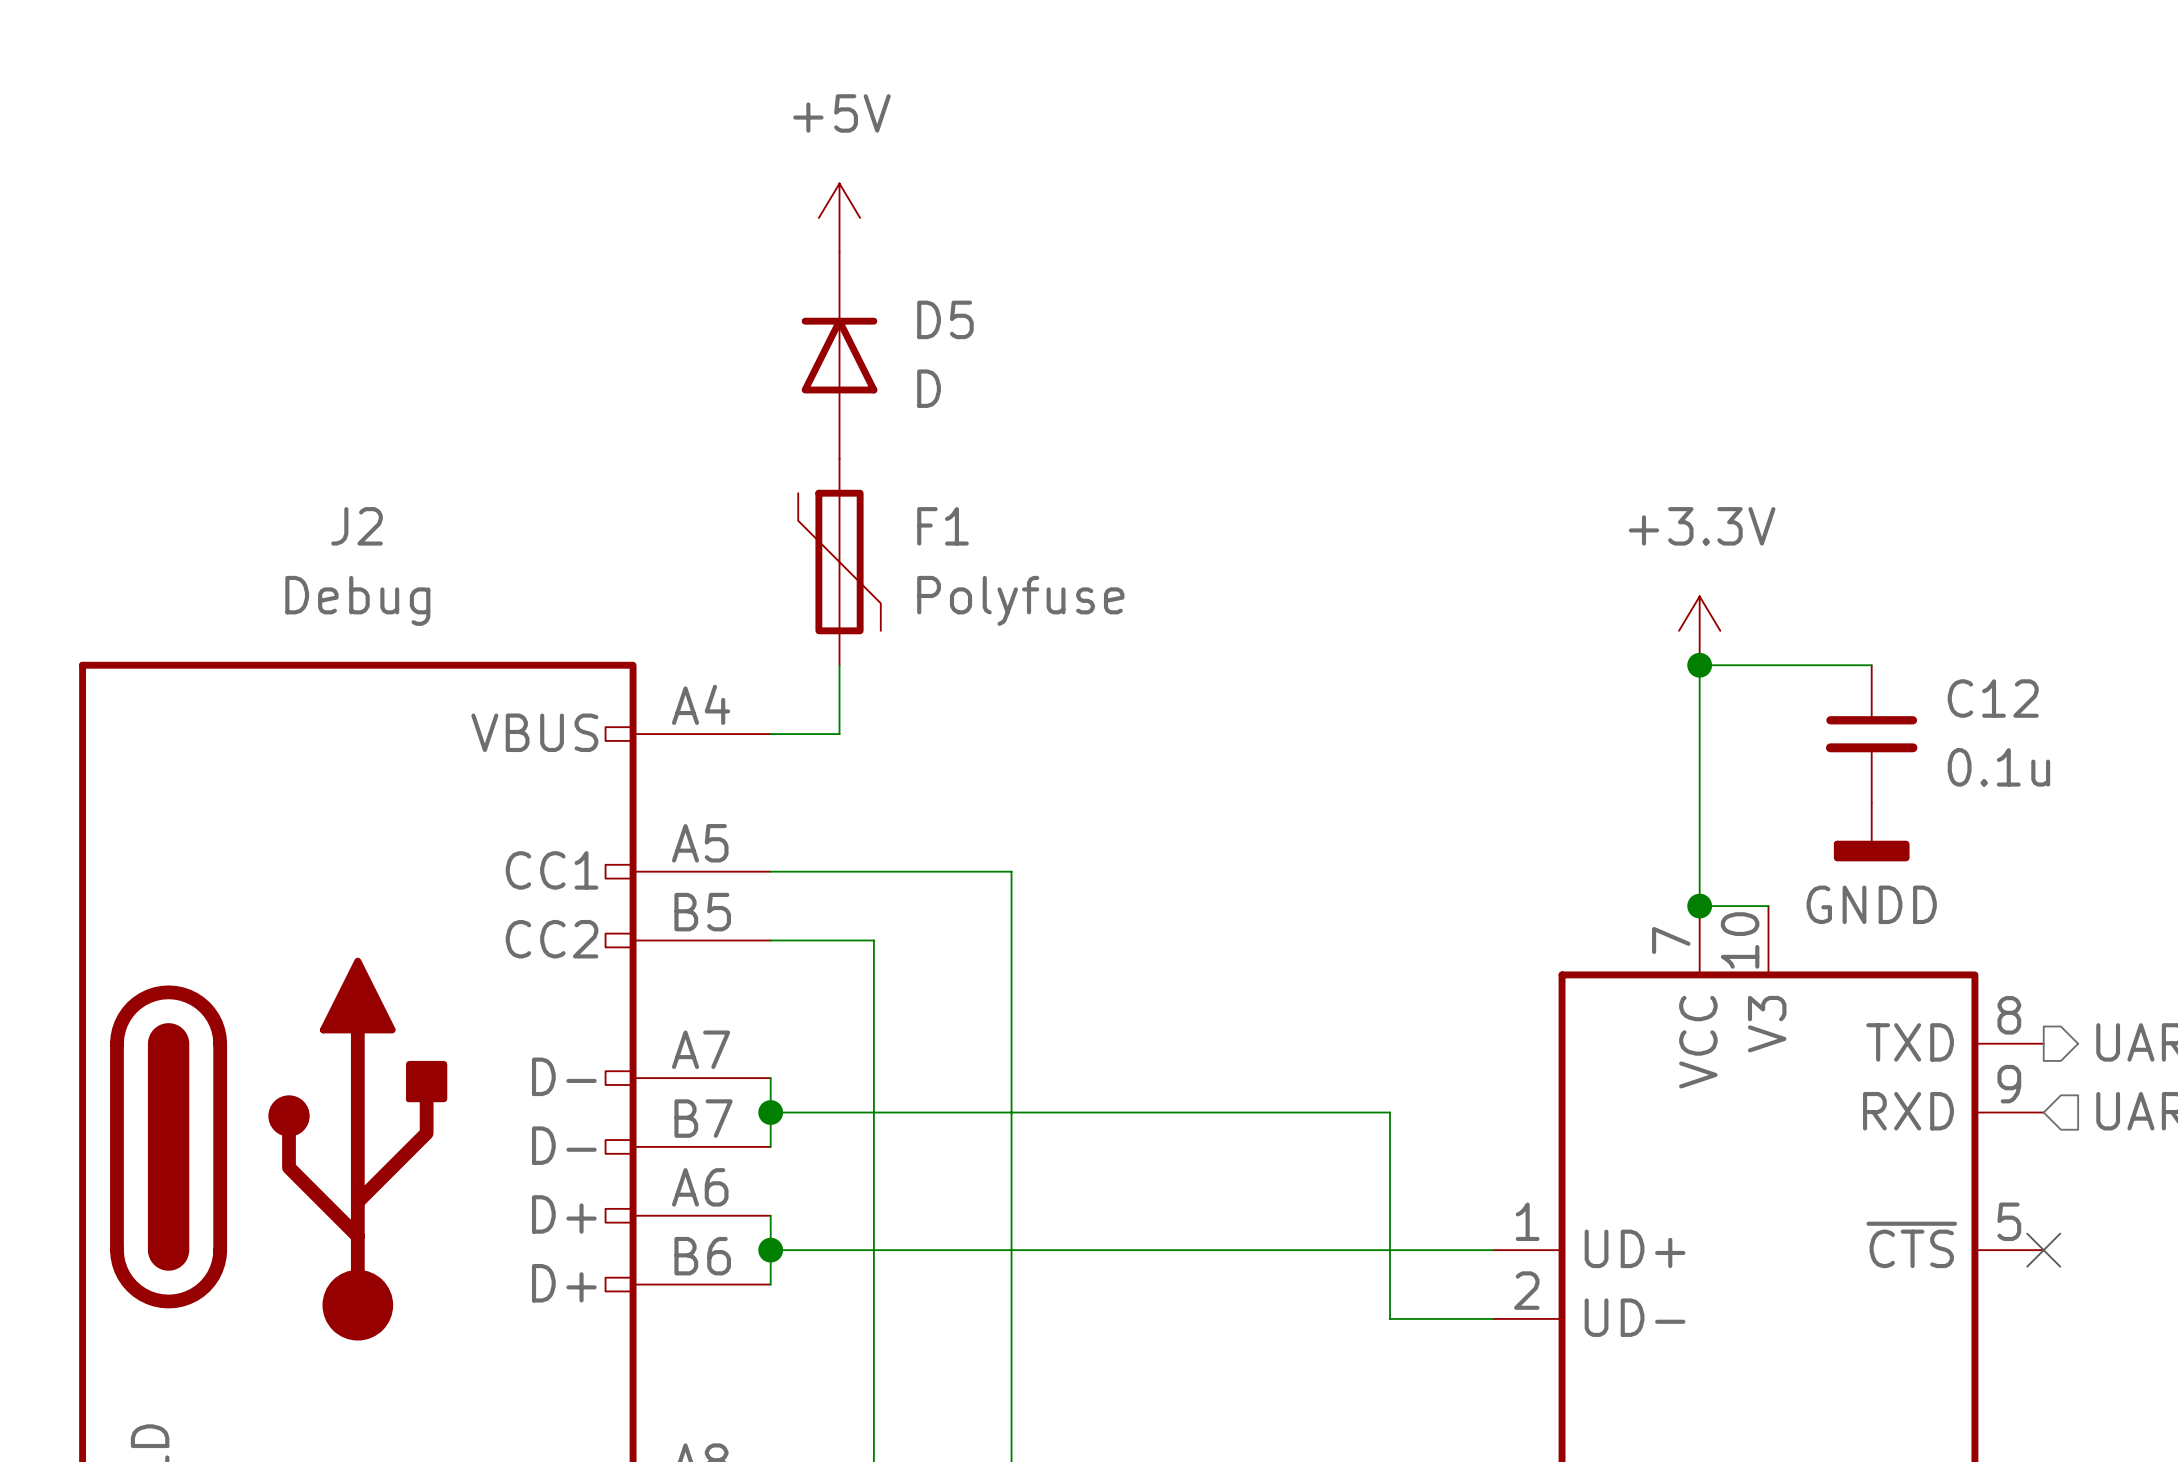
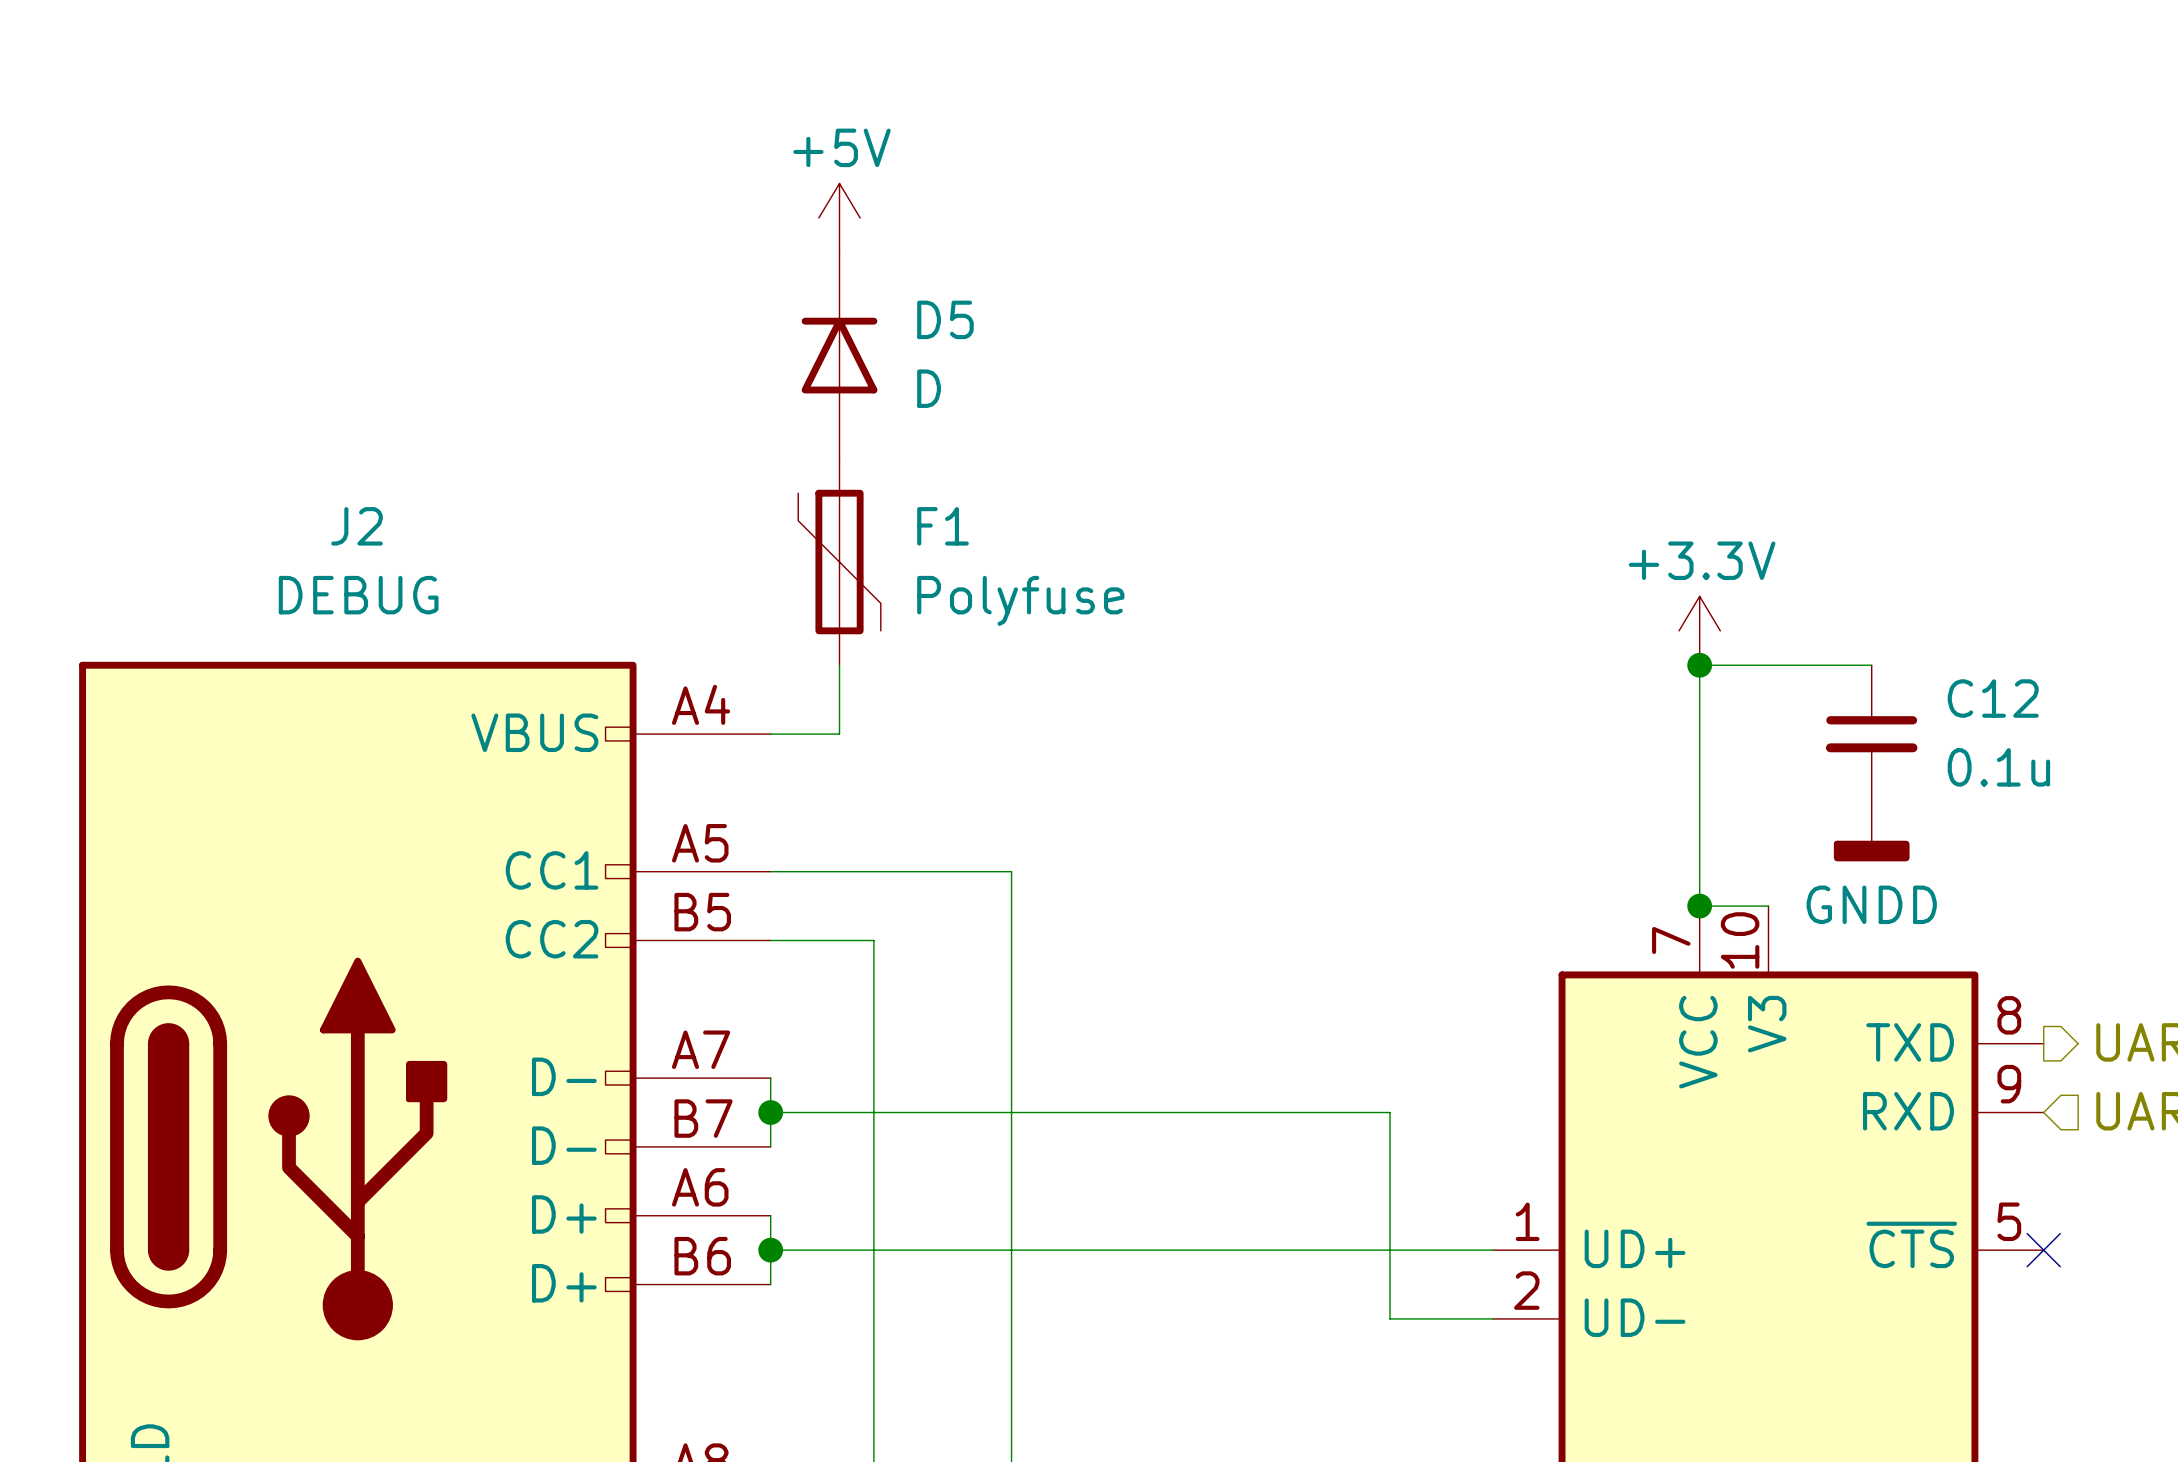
power symbol text position: +5V (841, 113) -> +5V (841, 147)
power symbol text position: +3.3V (1702, 526) -> +3.3V (1702, 560)
J2 value: Debug (357, 600) -> DEBUG (358, 595)

